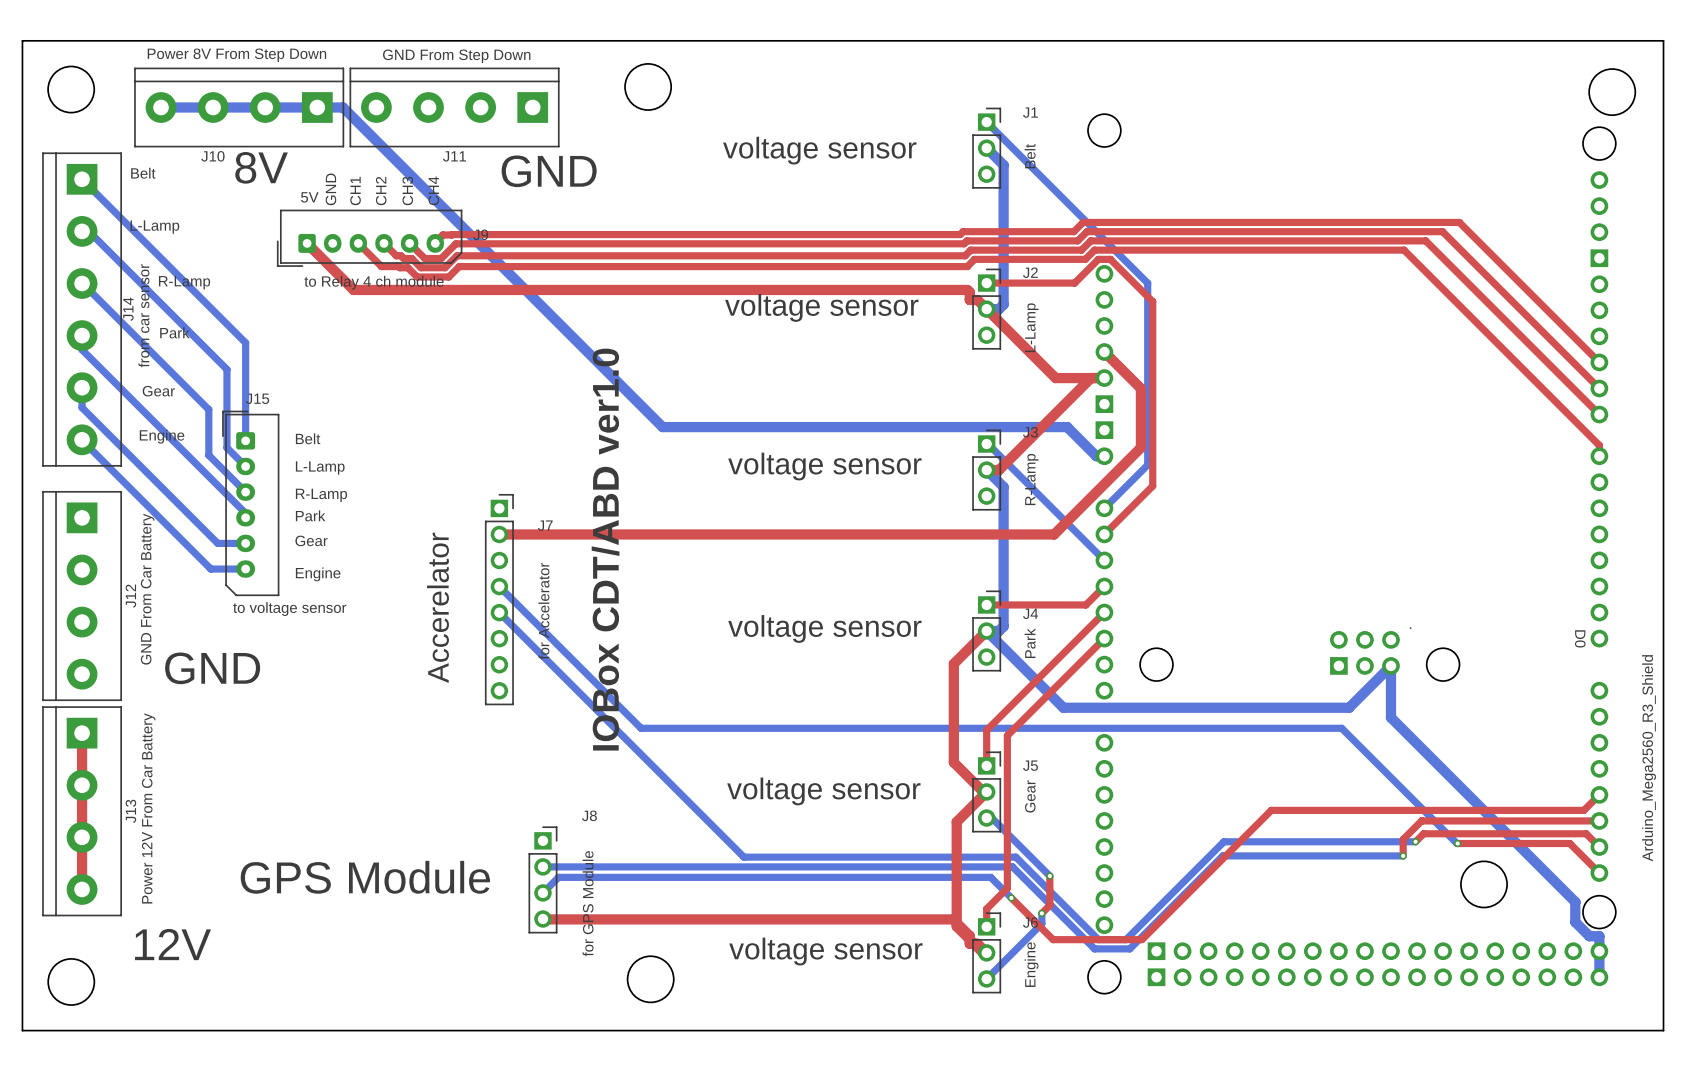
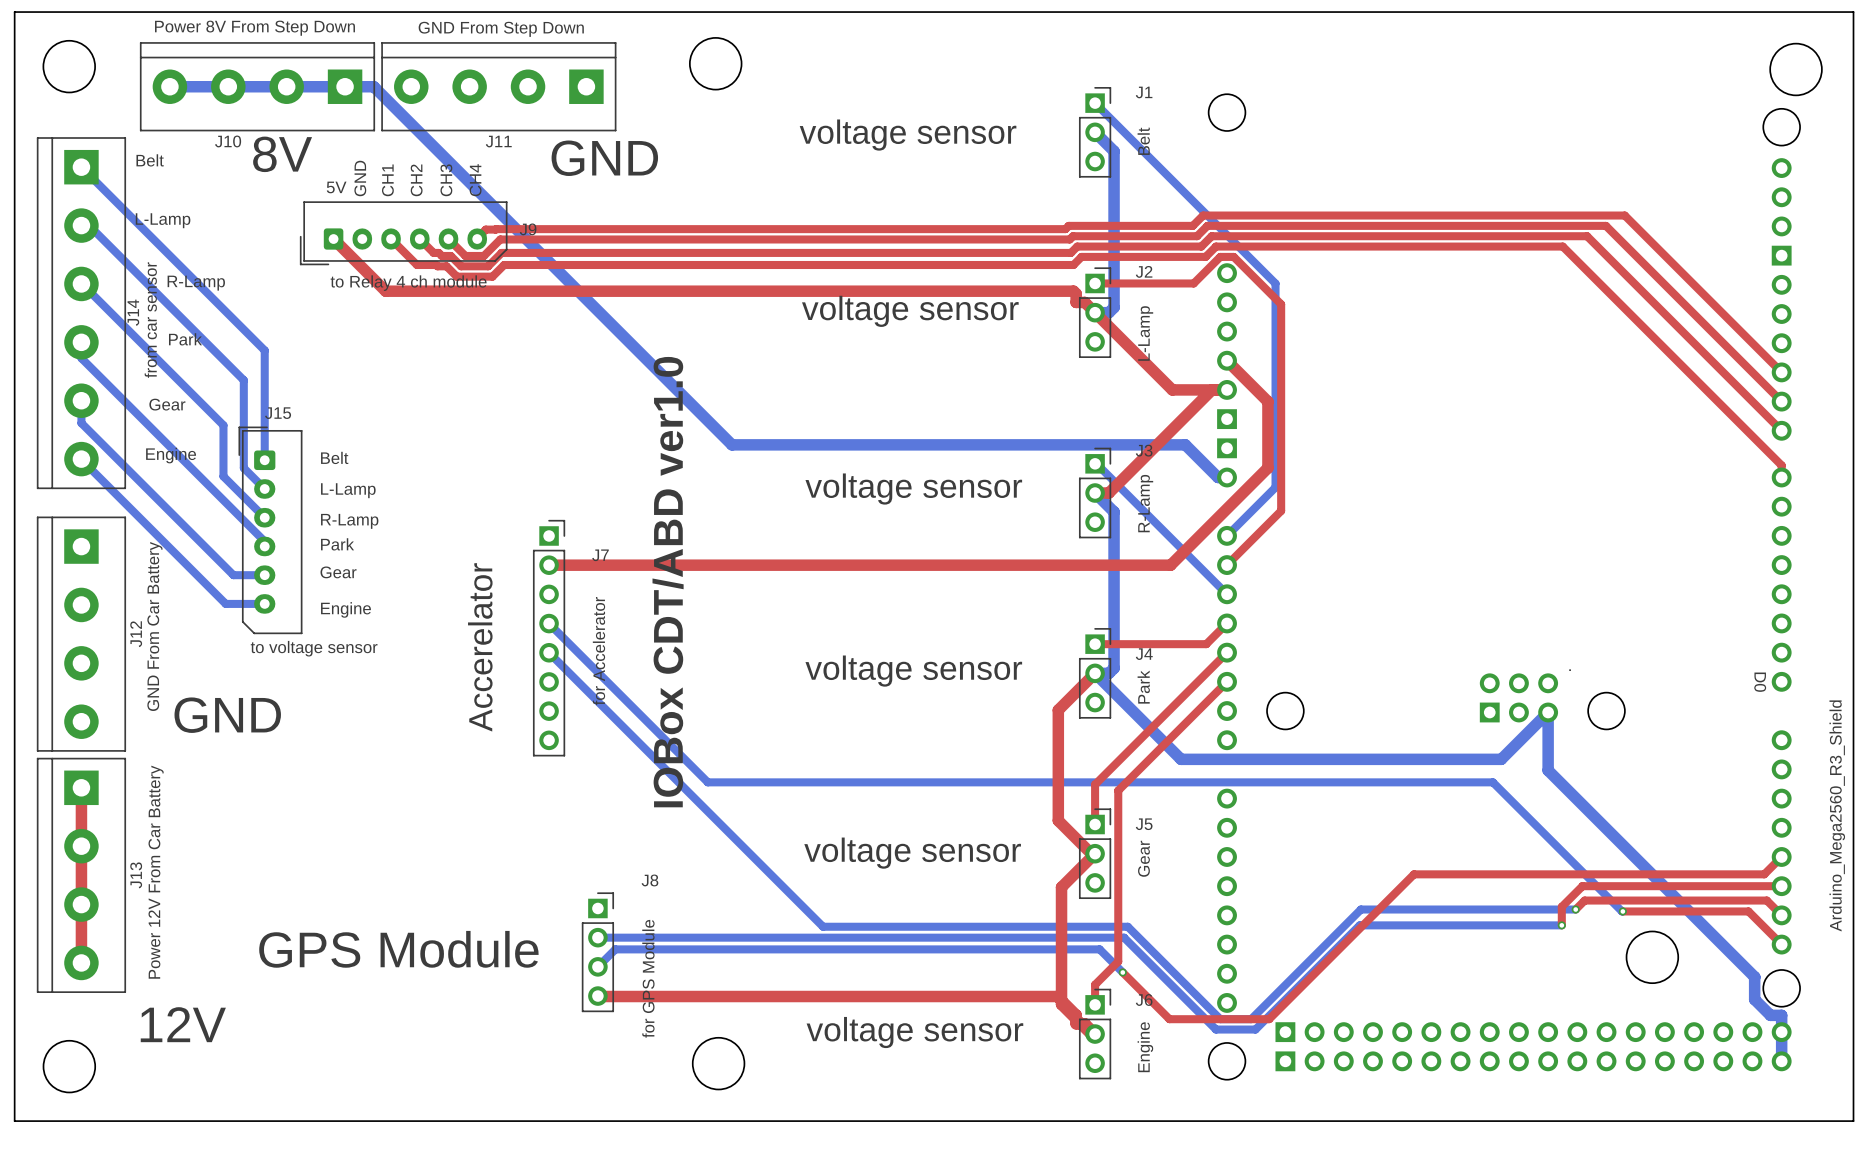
bottom track: (986, 818) (991, 818) (1049, 876) -> none
top track: (1049, 876) (1049, 905) (1041, 913) -> none
via: (1049, 876) -> none
bottom track: (1041, 913) (1041, 923) (986, 978) -> none
via: (1041, 913) -> none

